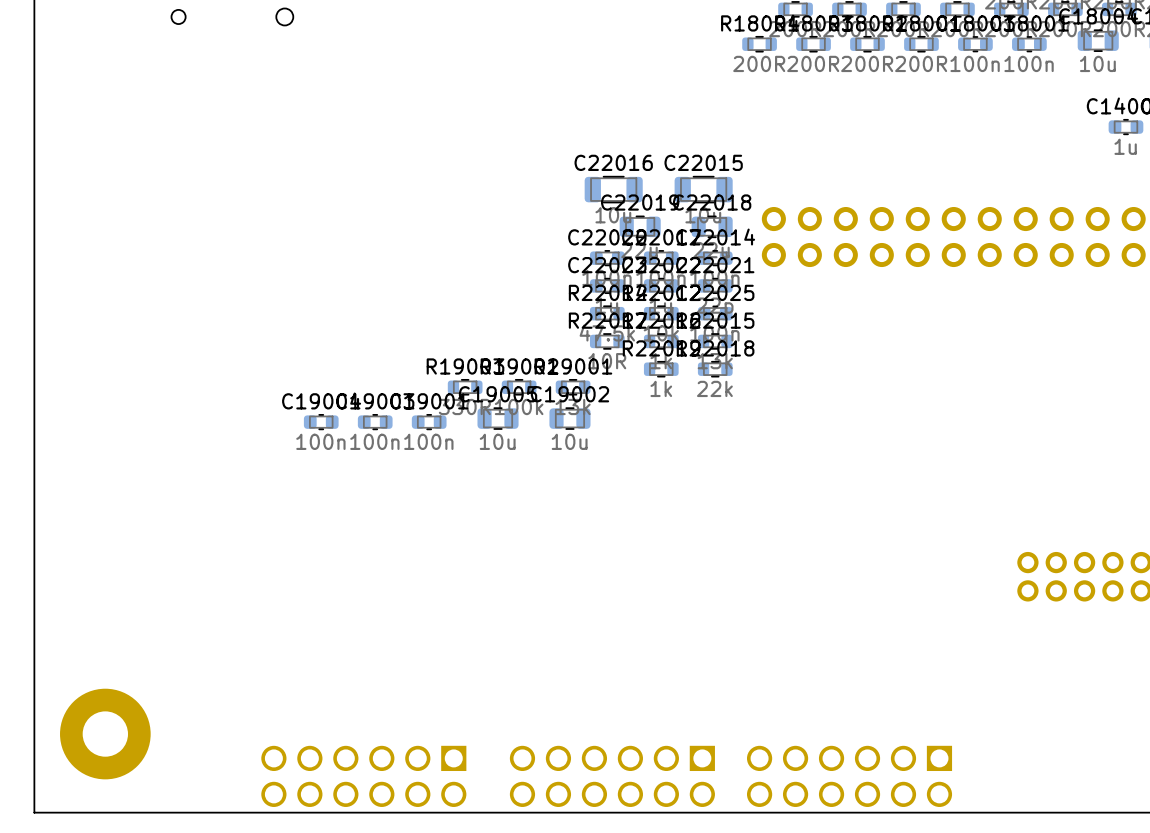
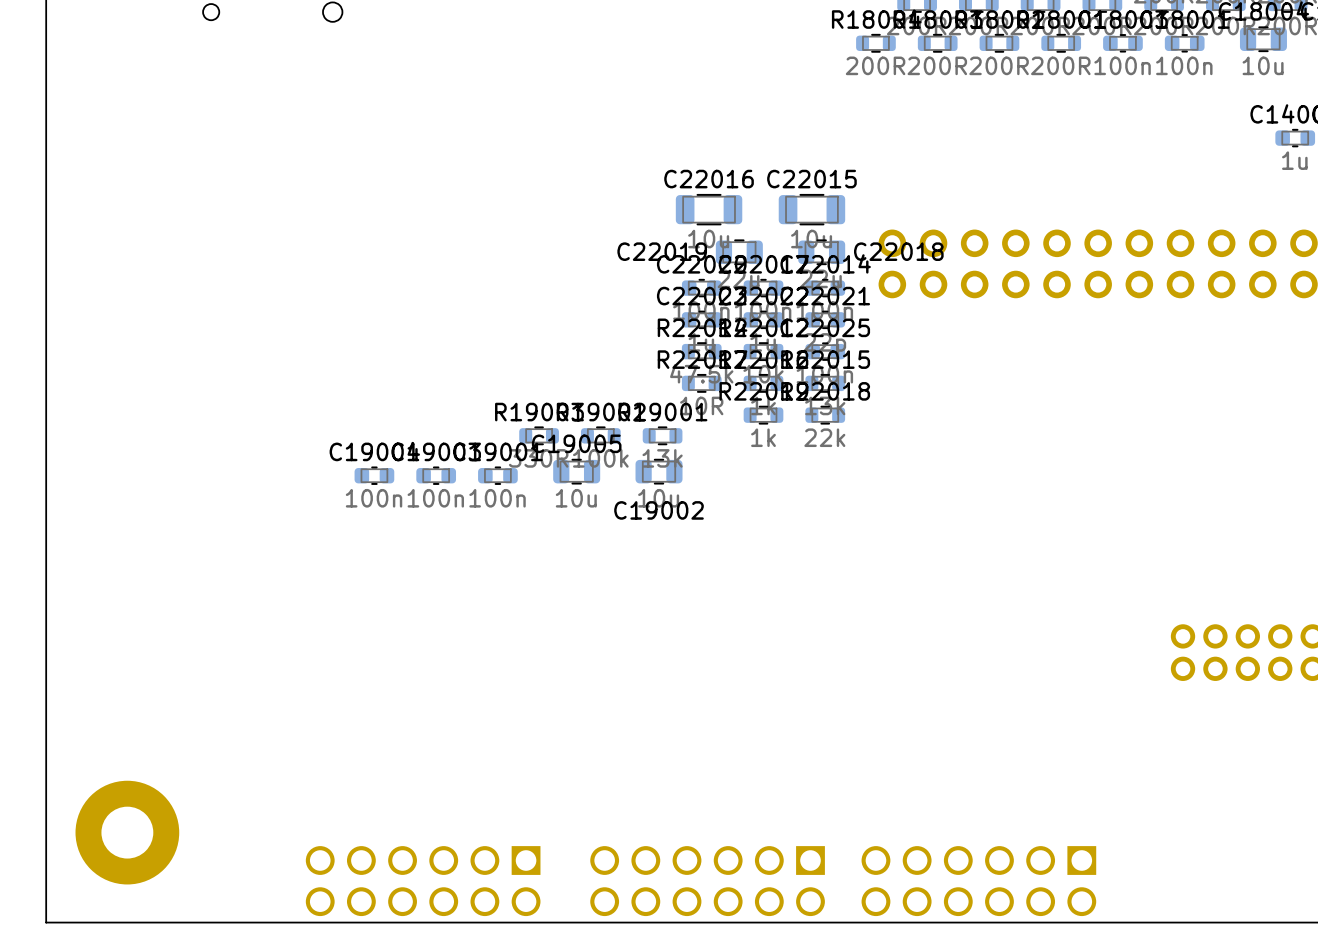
C22019 name position: C22019 (640, 202) -> C22019 (662, 251)
C22018 name position: C22018 (712, 202) -> C22018 (898, 251)
C19002 name position: C19002 (569, 394) -> C19002 (659, 510)

